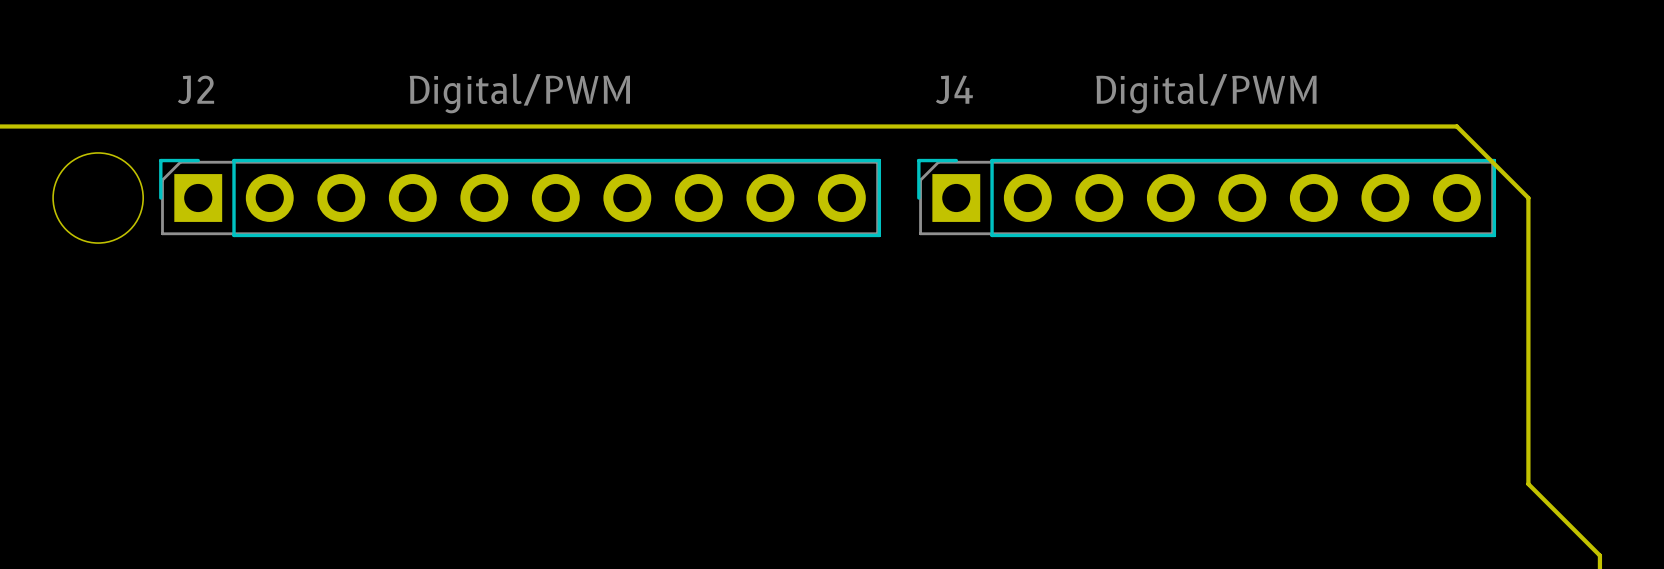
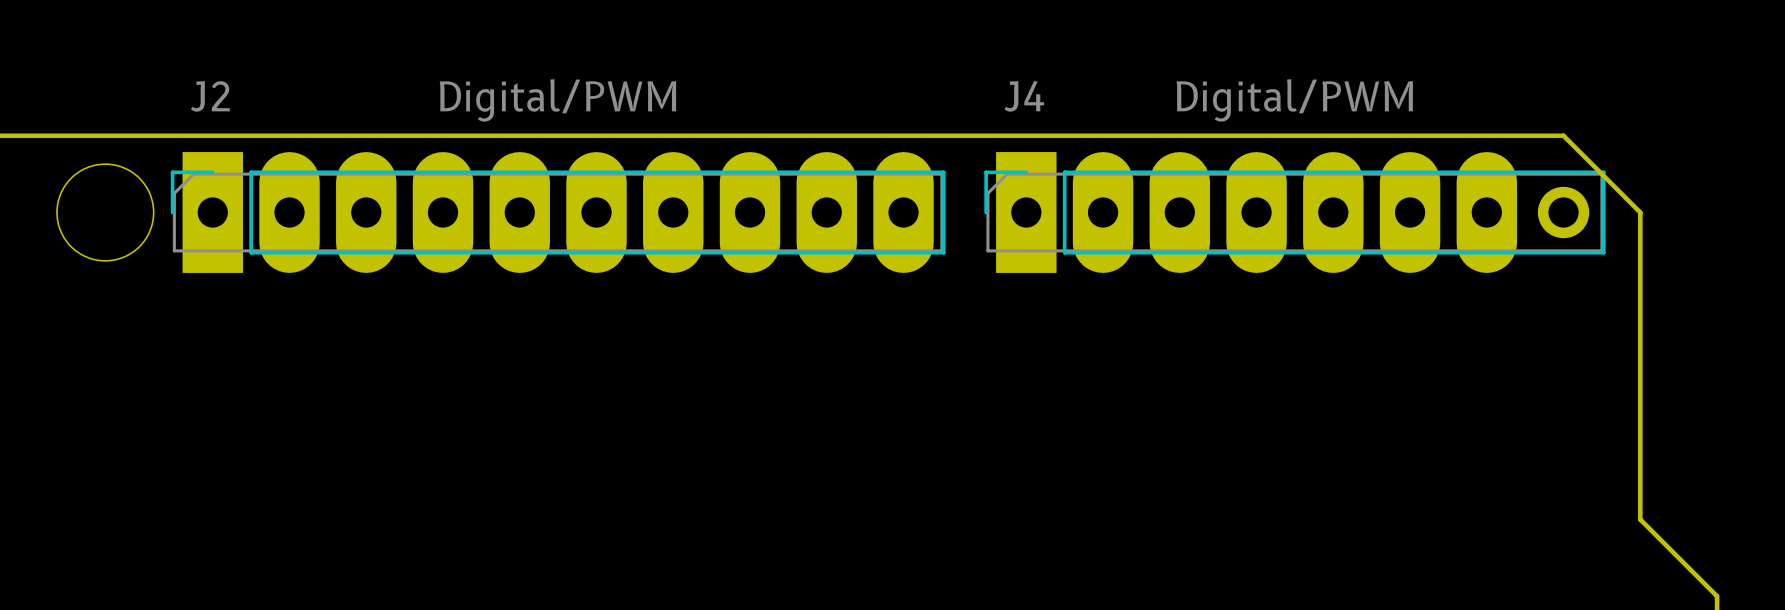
J2 footprint: [159, 158, 882, 238] -> [170, 152, 946, 273]
J4 footprint: [917, 158, 1497, 238] -> [984, 152, 1606, 273]

